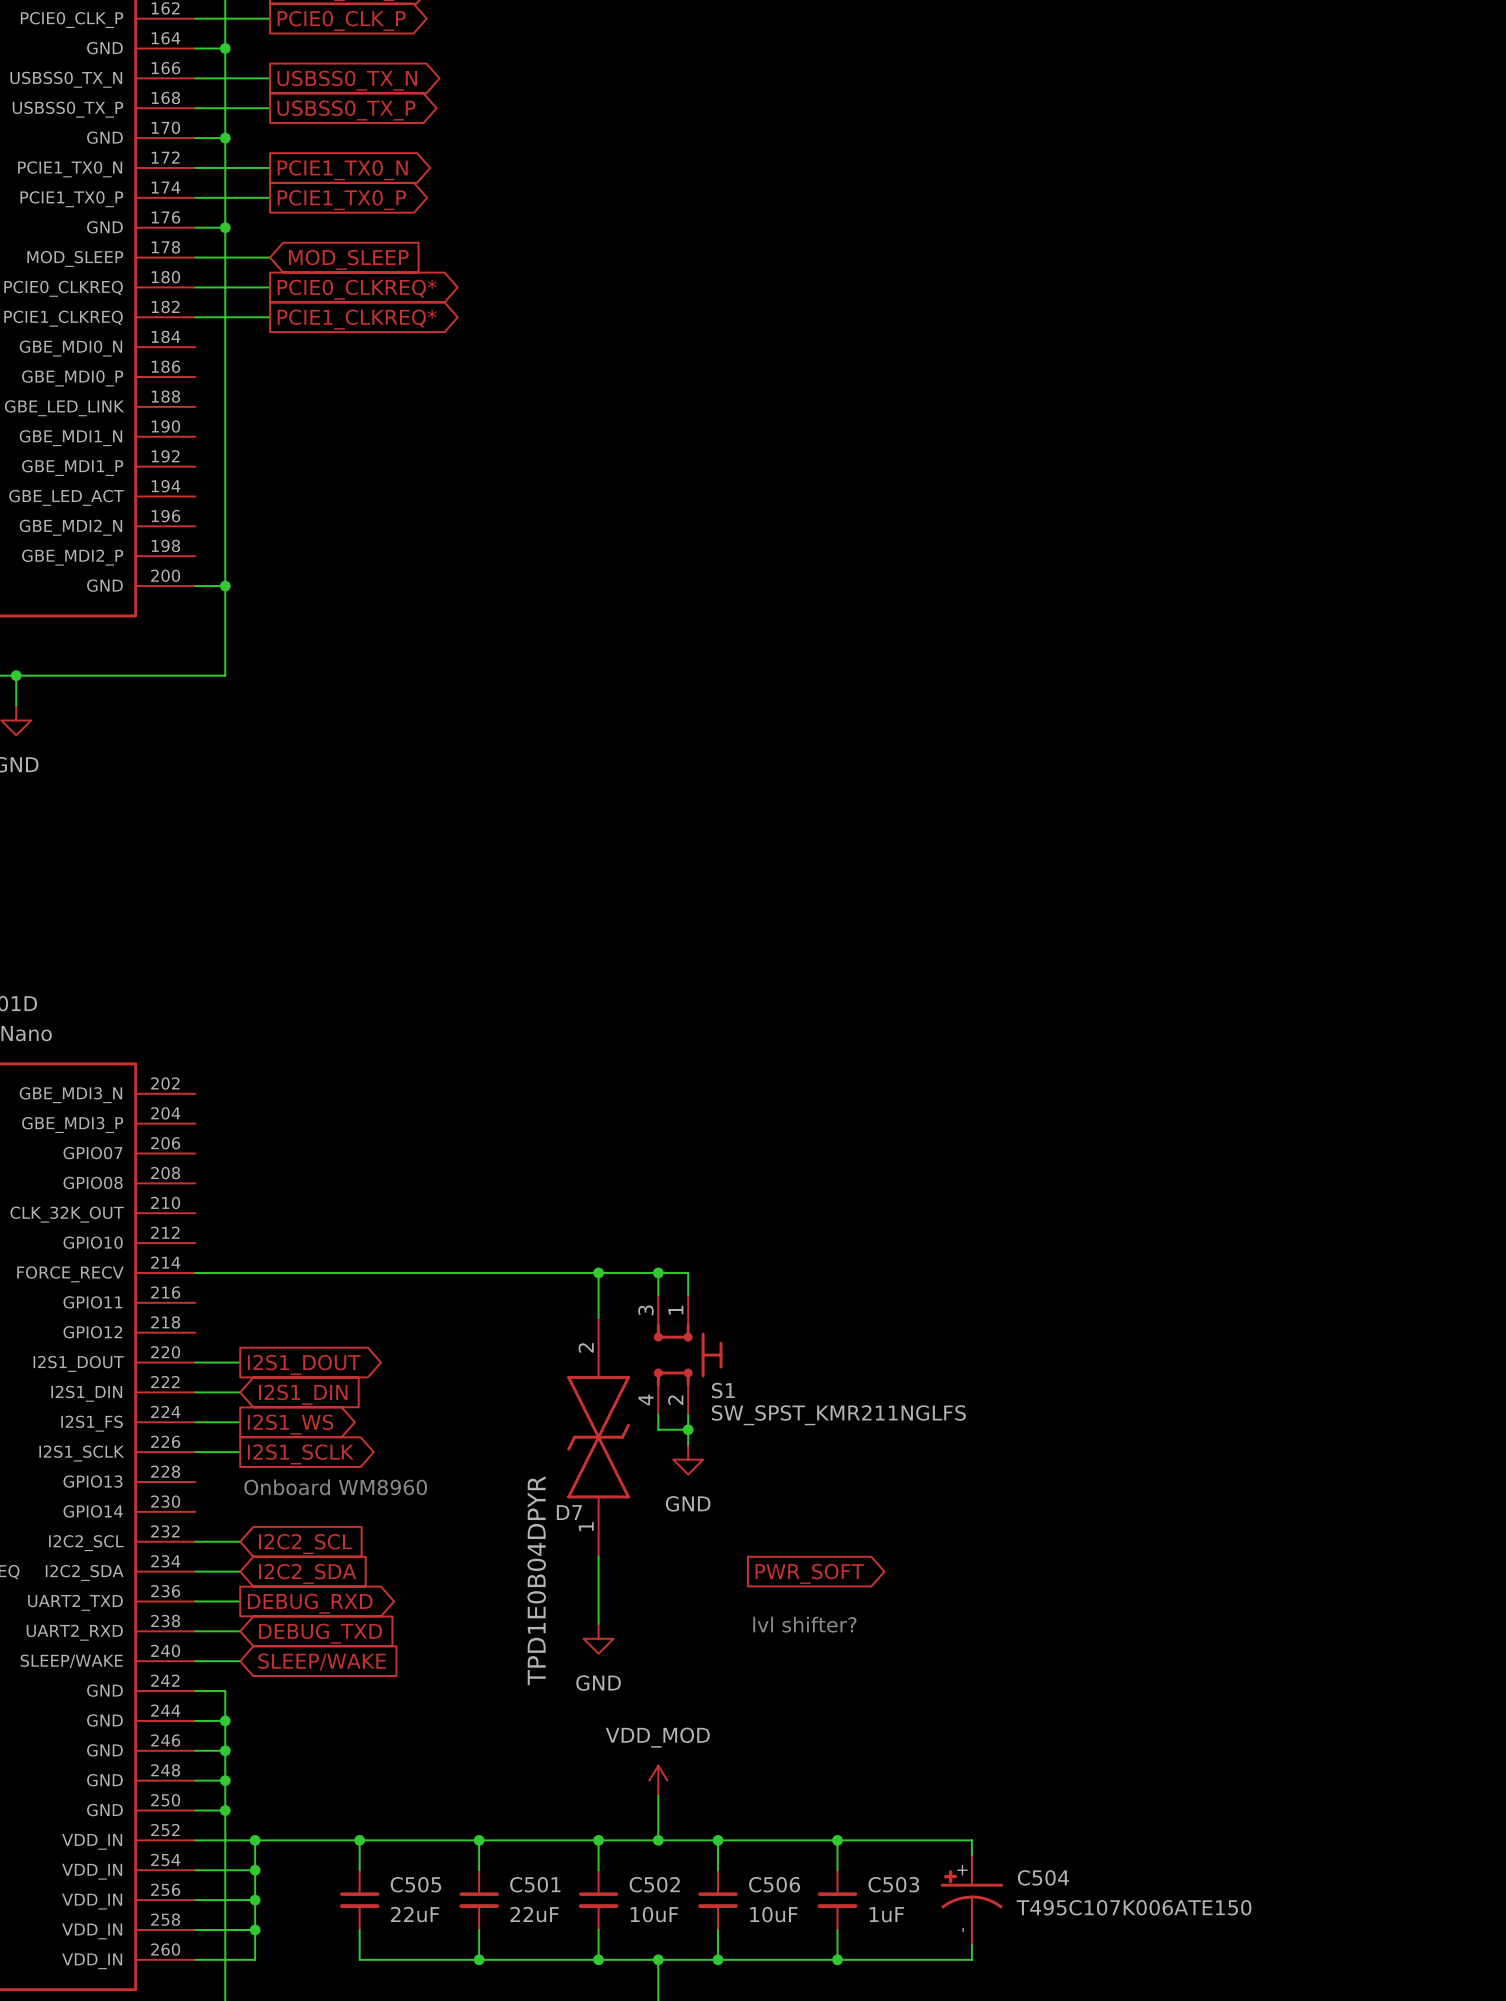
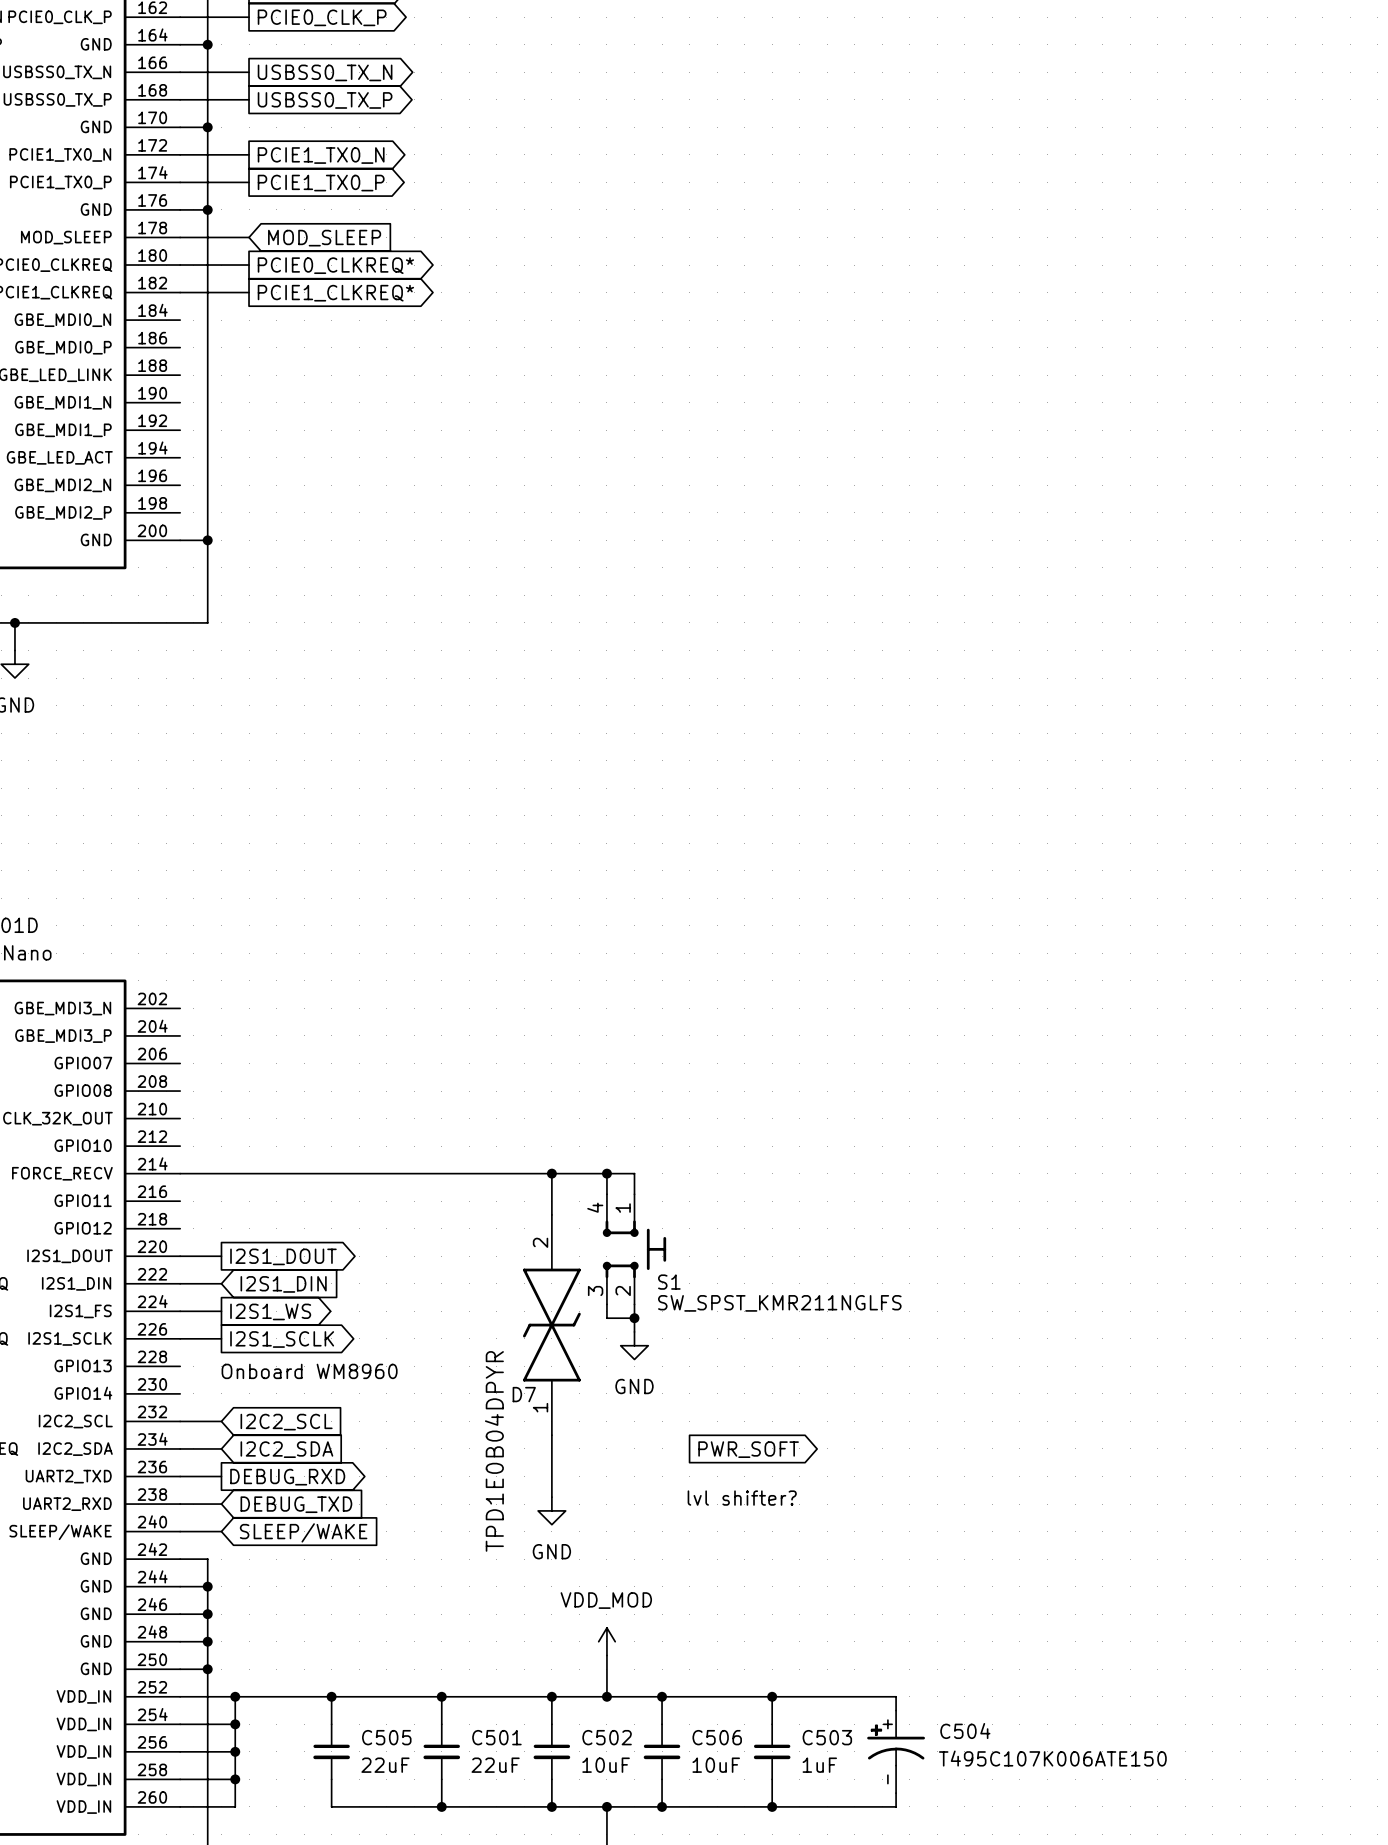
S1 pin number: 3 (646, 1310) -> 4 (595, 1207)
S1 pin number: 4 (646, 1399) -> 3 (595, 1290)

